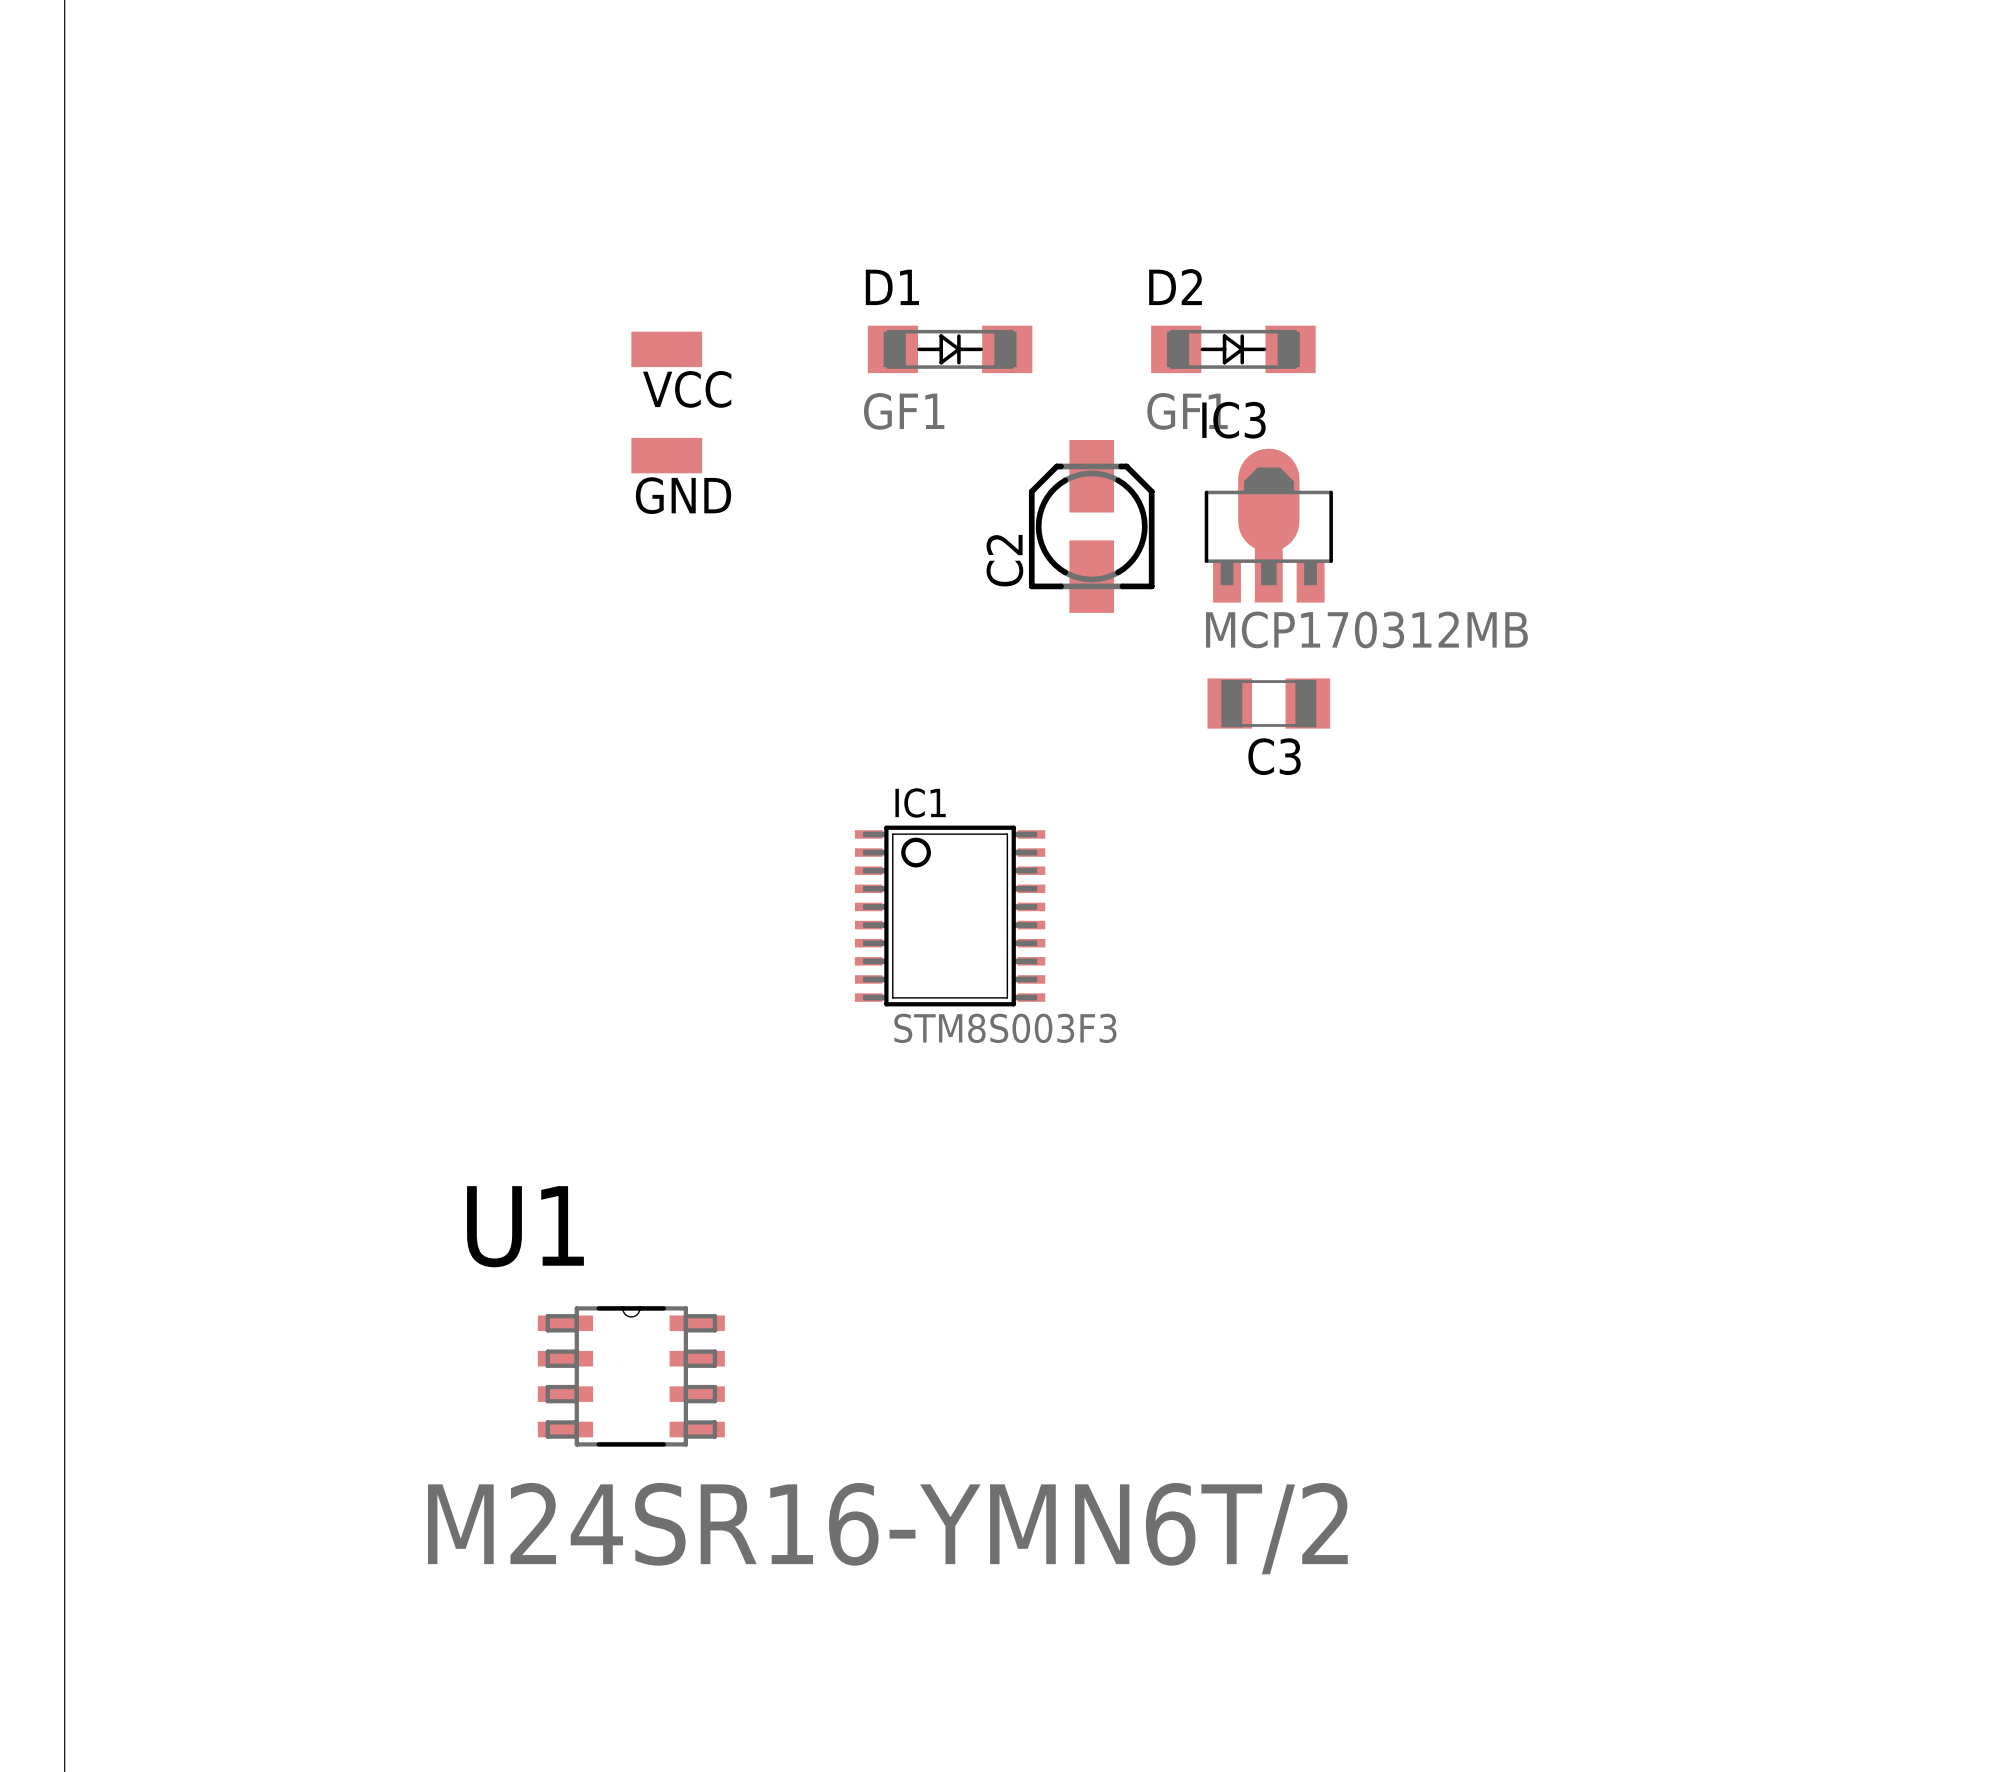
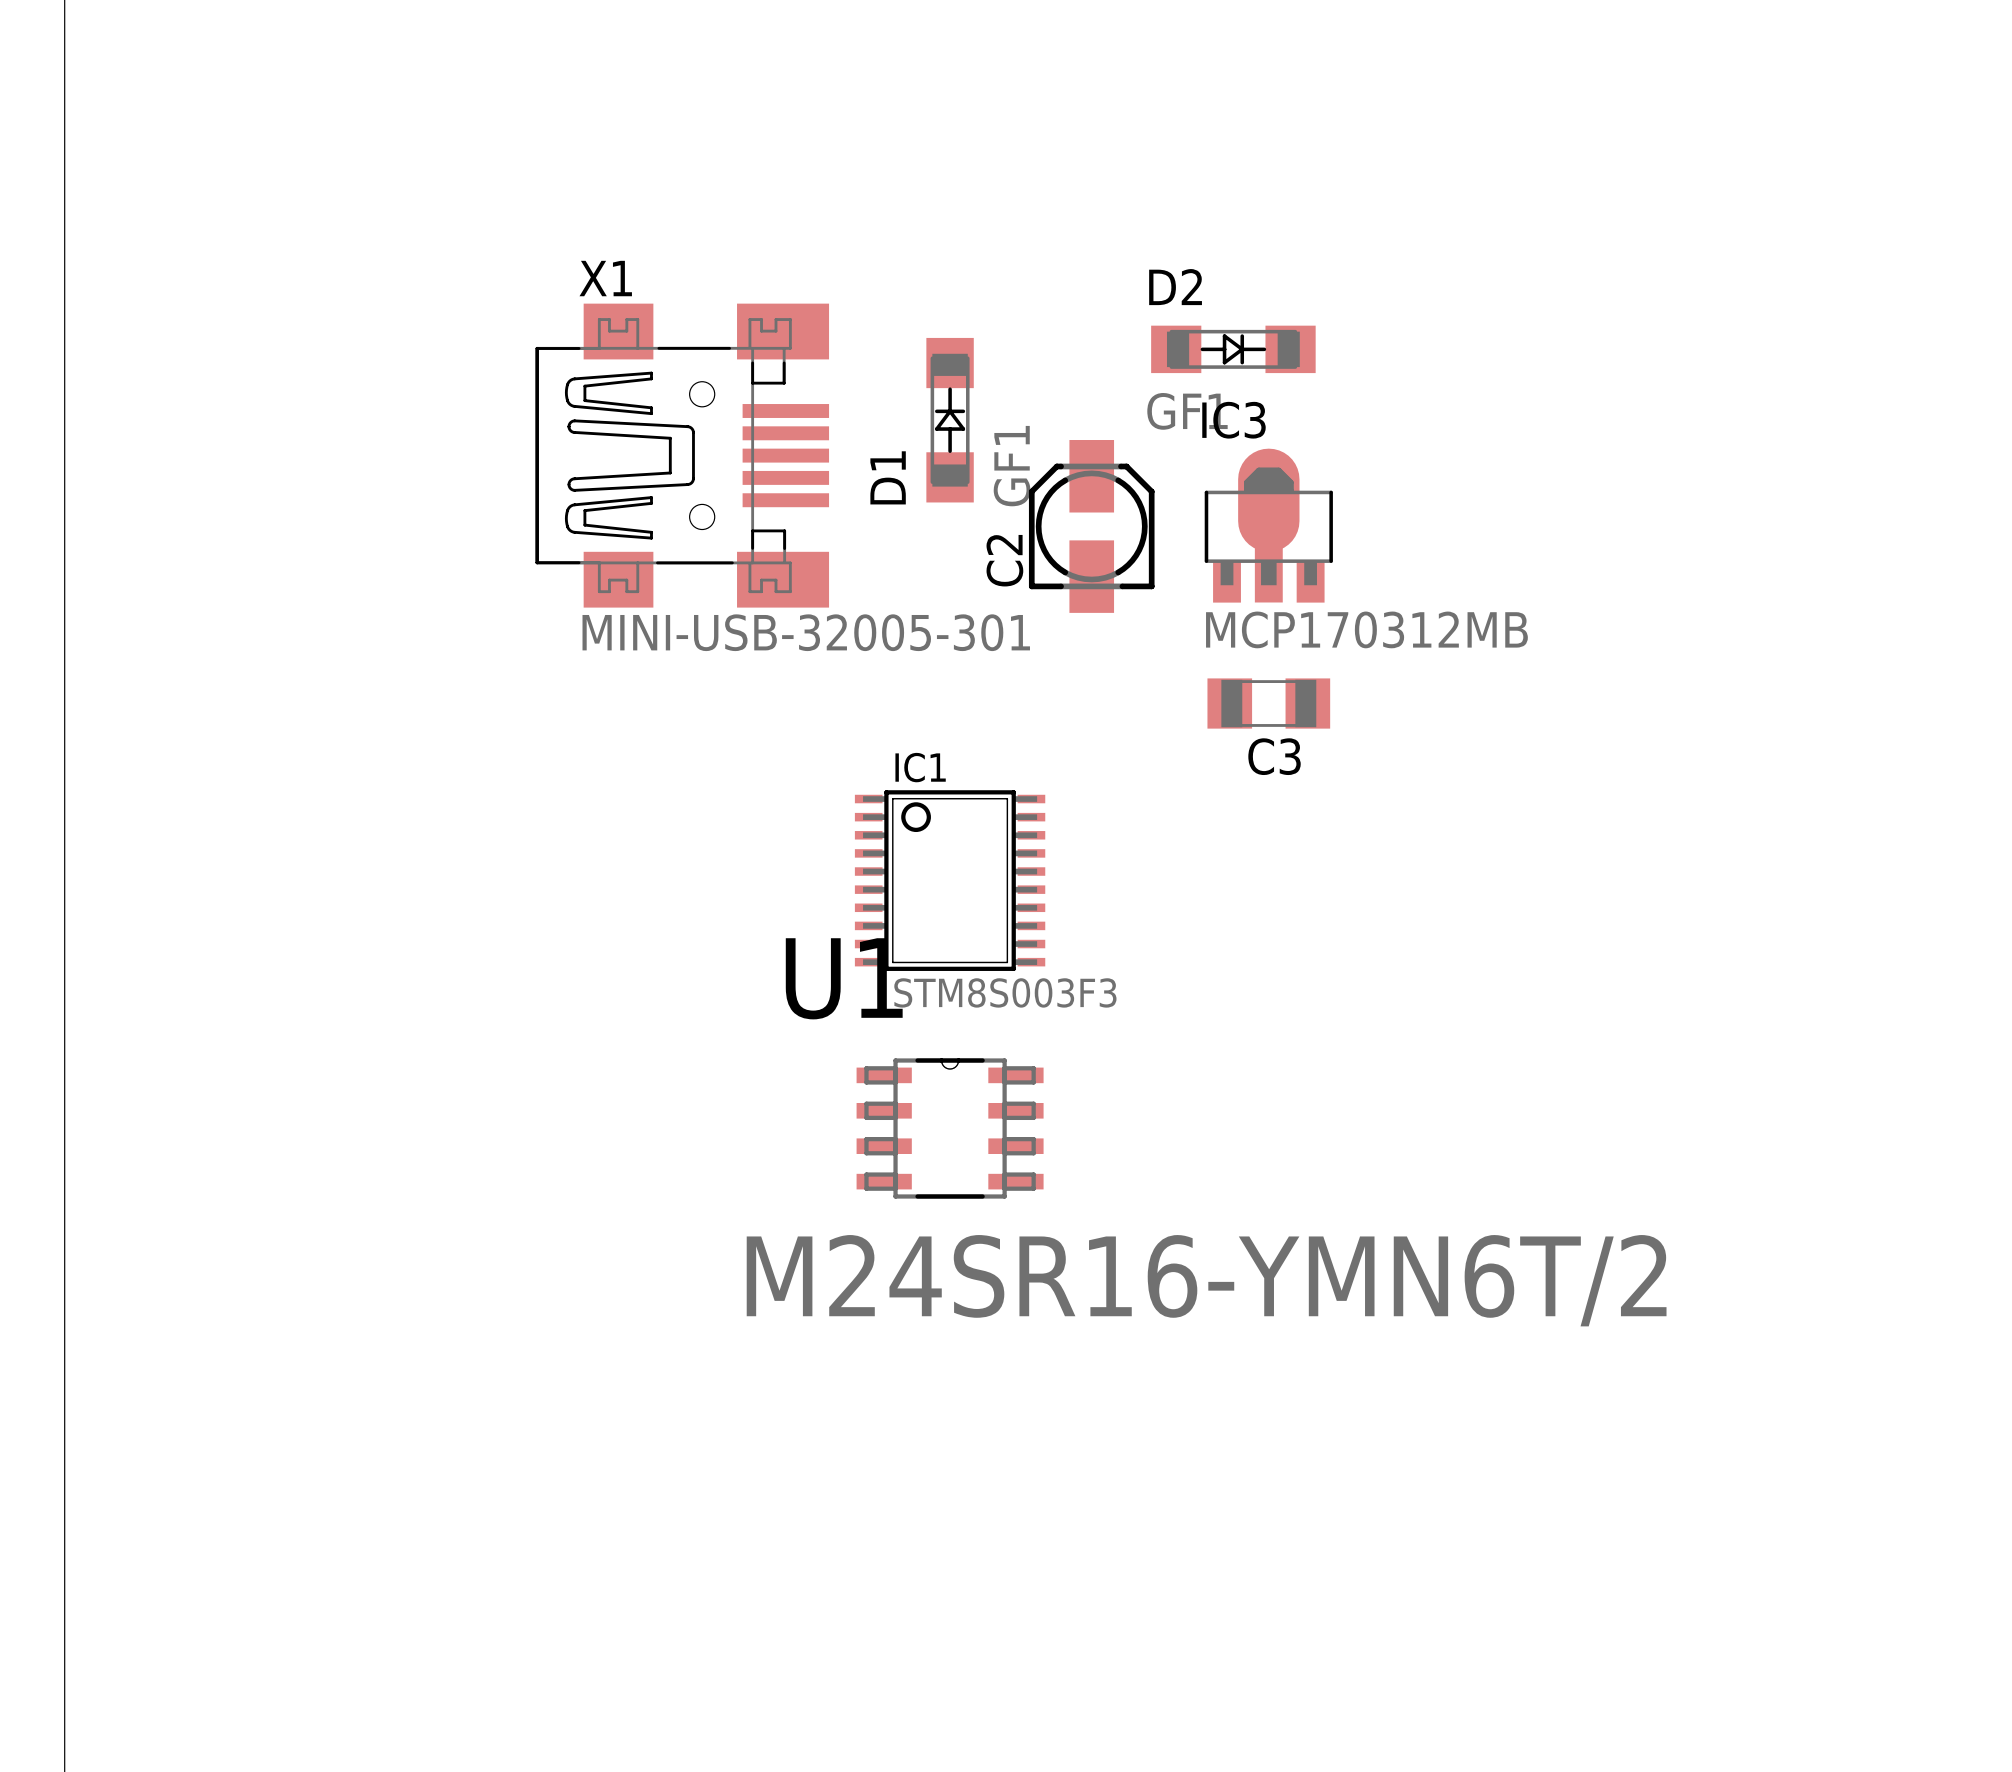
D1 name position: D1 (892, 287) -> D1 (888, 477)
VCC: (666, 349) -> none
D1 rotation: 0° (950, 349) -> 90° clockwise (950, 420)
D1 value position: GF1 (904, 411) -> GF1 (1012, 466)
GND: (666, 455) -> none
X1: none -> MINI-USB-32005-301 (682, 455)
IC1 position: (950, 916) -> (950, 880)
U1 position: (631, 1376) -> (950, 1128)

